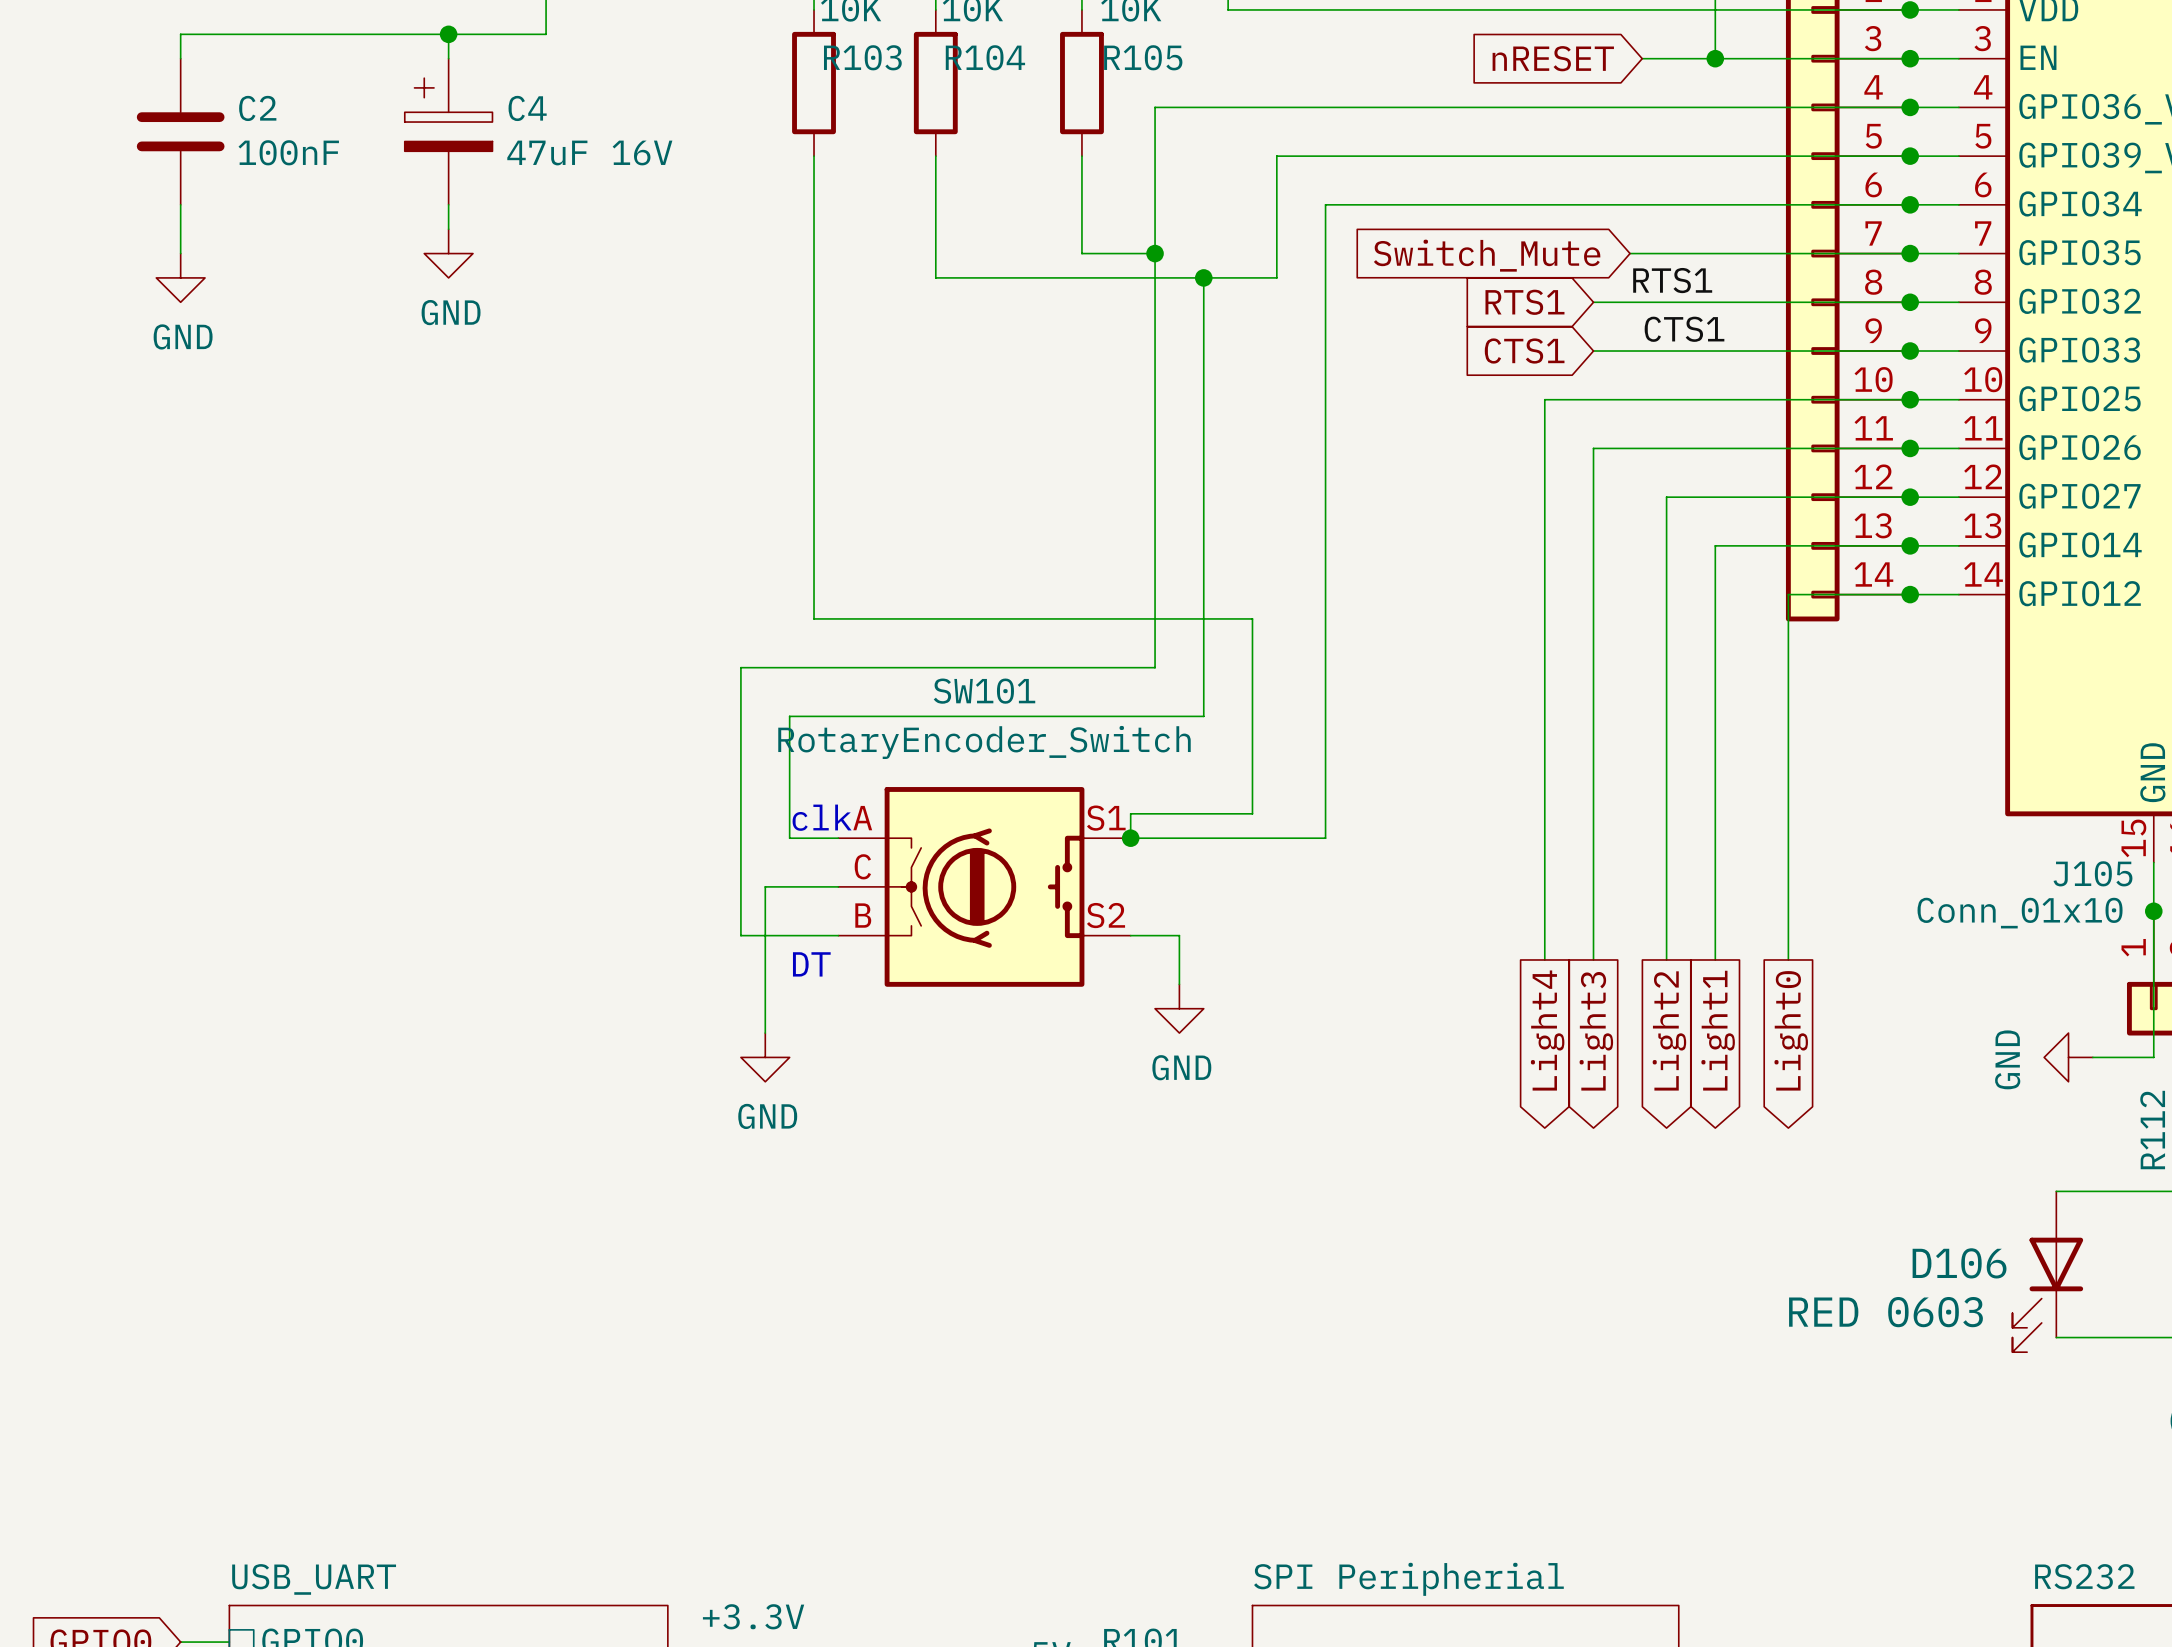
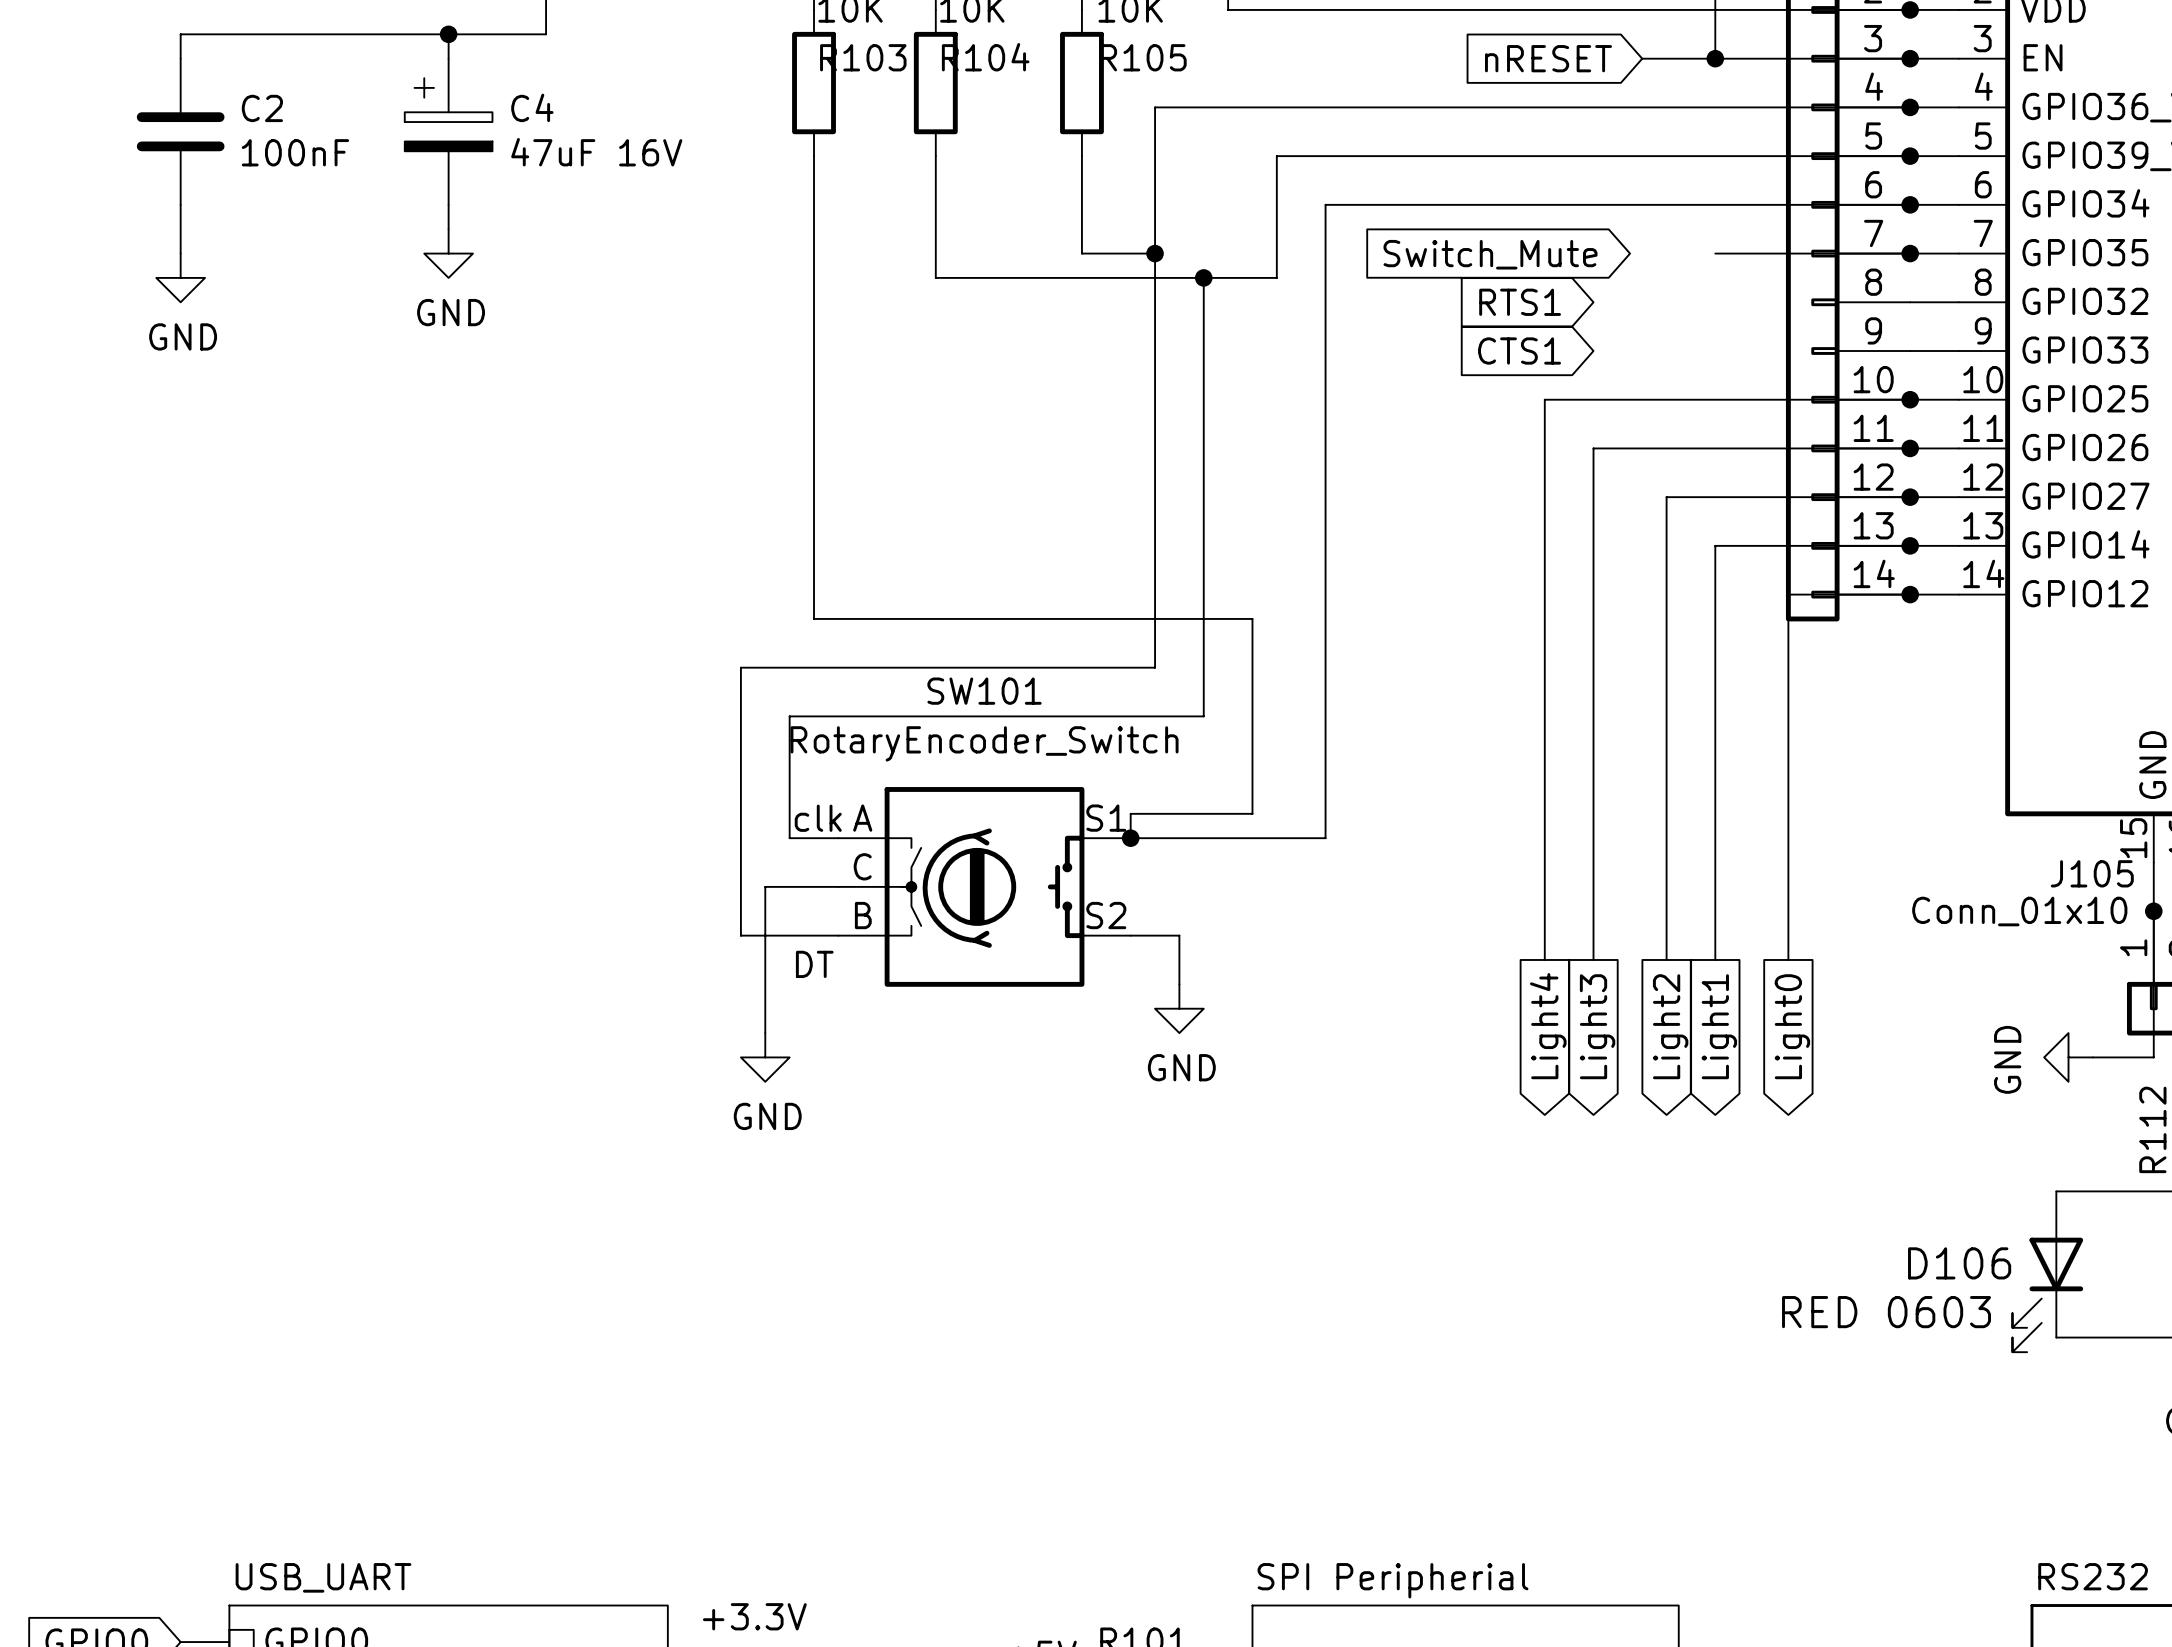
wire: (1630, 253) (1715, 253) -> none
label: RTS1 (1672, 280) -> none
wire: (1593, 302) (1910, 302) -> none
junction: (1910, 302) -> none
label: CTS1 (1684, 329) -> none
wire: (1593, 351) (1910, 351) -> none
junction: (1910, 351) -> none

